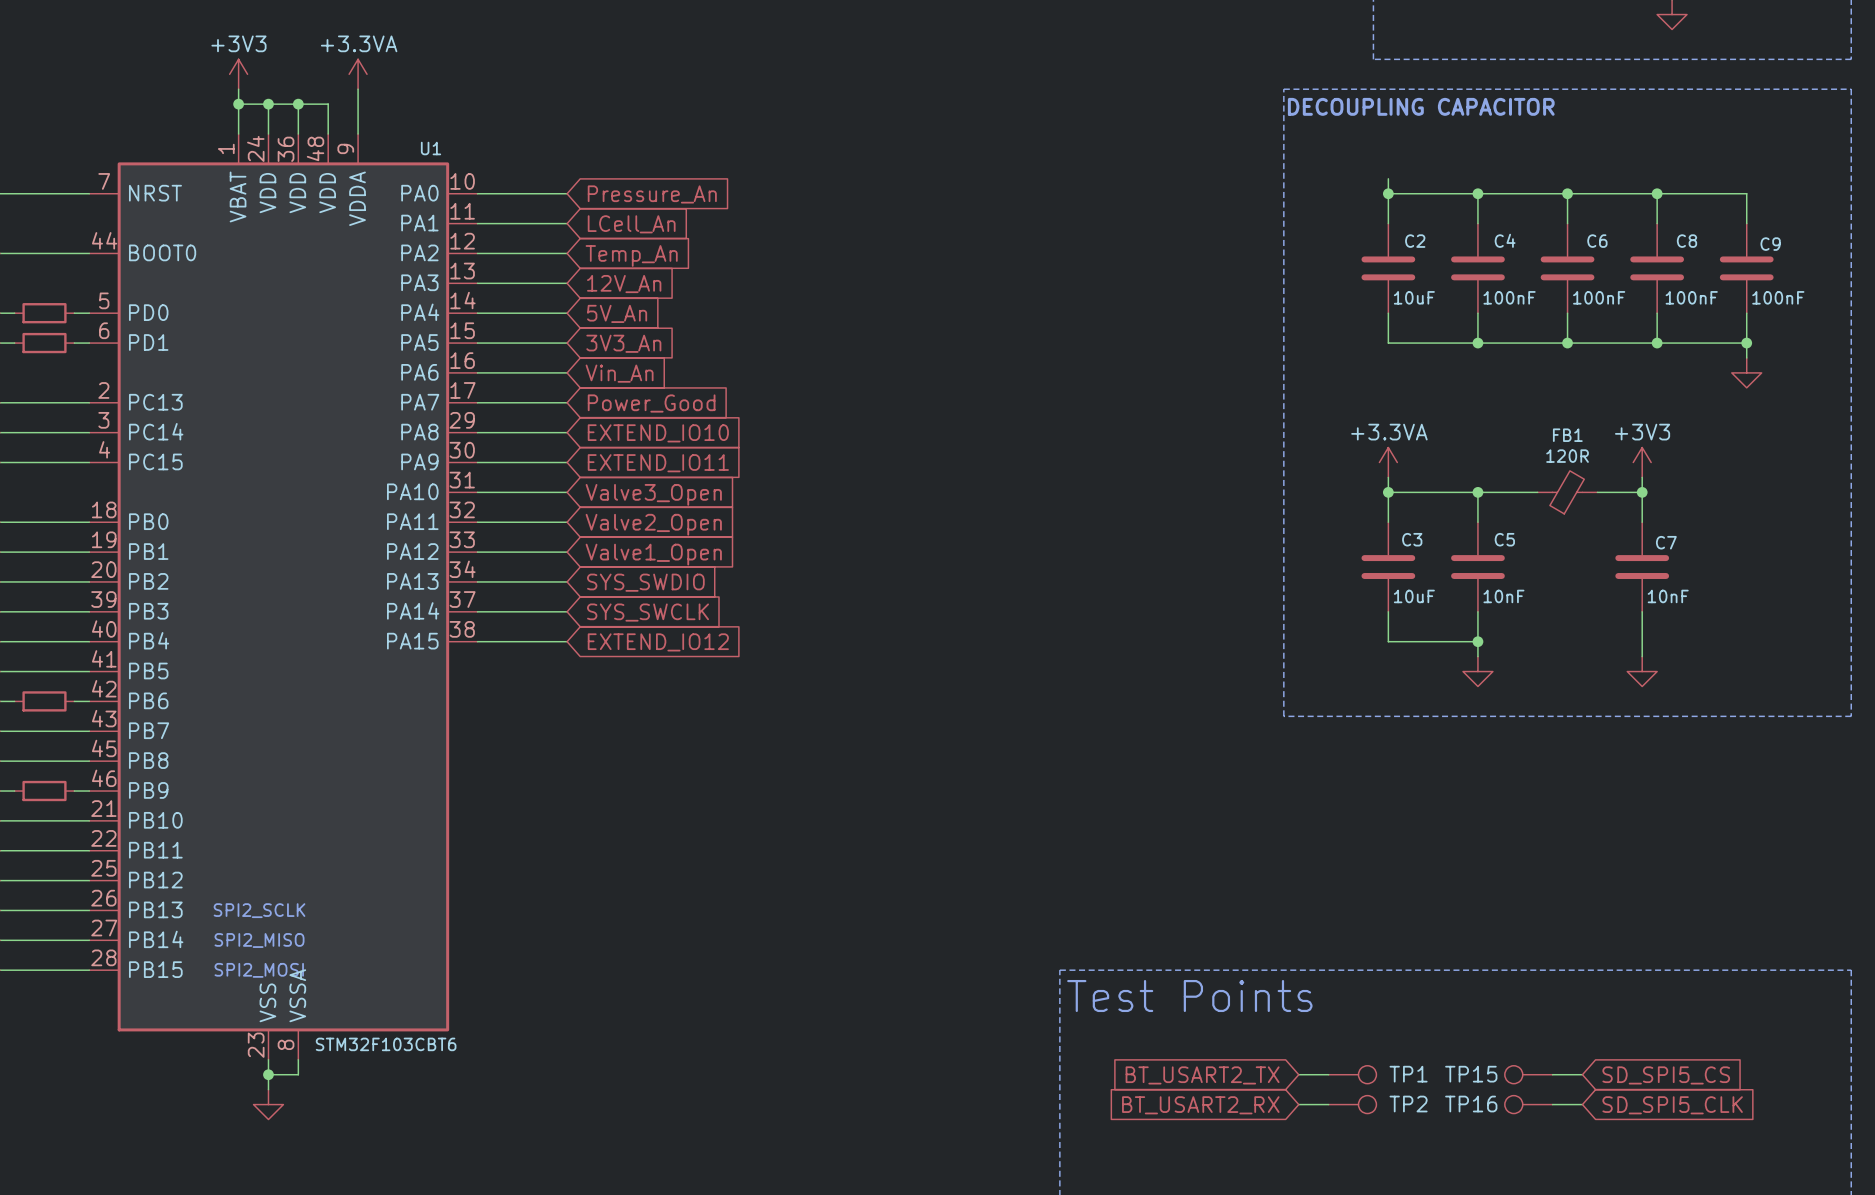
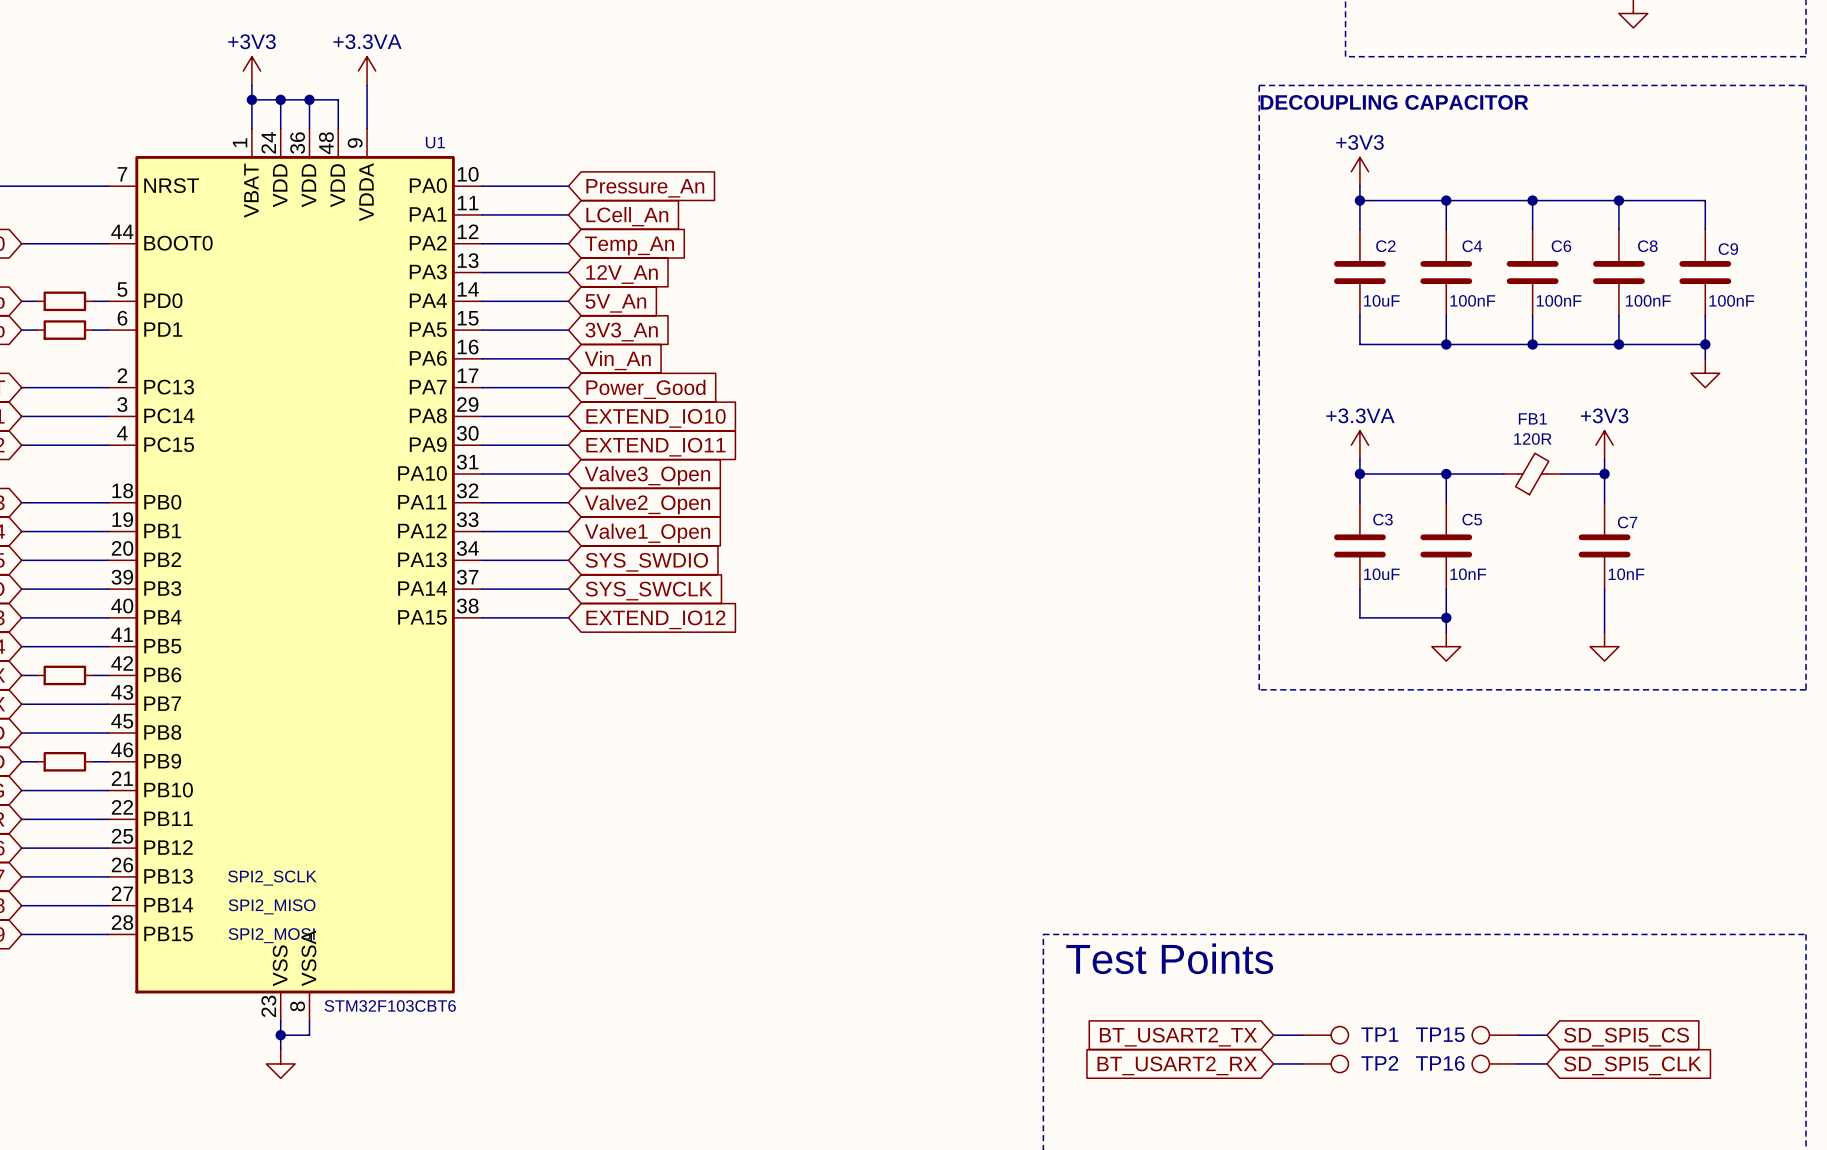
wire: (1388, 178) (1388, 193) (1746, 193) (1746, 208) -> (1359, 200) (1705, 200)
power symbol: none -> +3V3 (1359, 171)
junction position: (1388, 193) -> (1359, 200)
junction position: (1477, 193) -> (1446, 200)
junction position: (1567, 193) -> (1532, 200)
junction position: (1657, 193) -> (1618, 200)
C2 position: (1388, 268) -> (1359, 272)
C4 position: (1477, 268) -> (1446, 272)
C6 position: (1567, 268) -> (1532, 272)
C8 position: (1657, 268) -> (1618, 272)
C9 position: (1746, 268) -> (1705, 272)
wire: (1388, 343) (1746, 343) -> (1359, 330) (1359, 344) (1705, 344) (1705, 358)
junction position: (1477, 343) -> (1446, 344)
junction position: (1567, 343) -> (1532, 344)
junction position: (1657, 343) -> (1618, 344)
junction position: (1746, 343) -> (1705, 344)
power symbol position: (1746, 372) -> (1705, 373)

